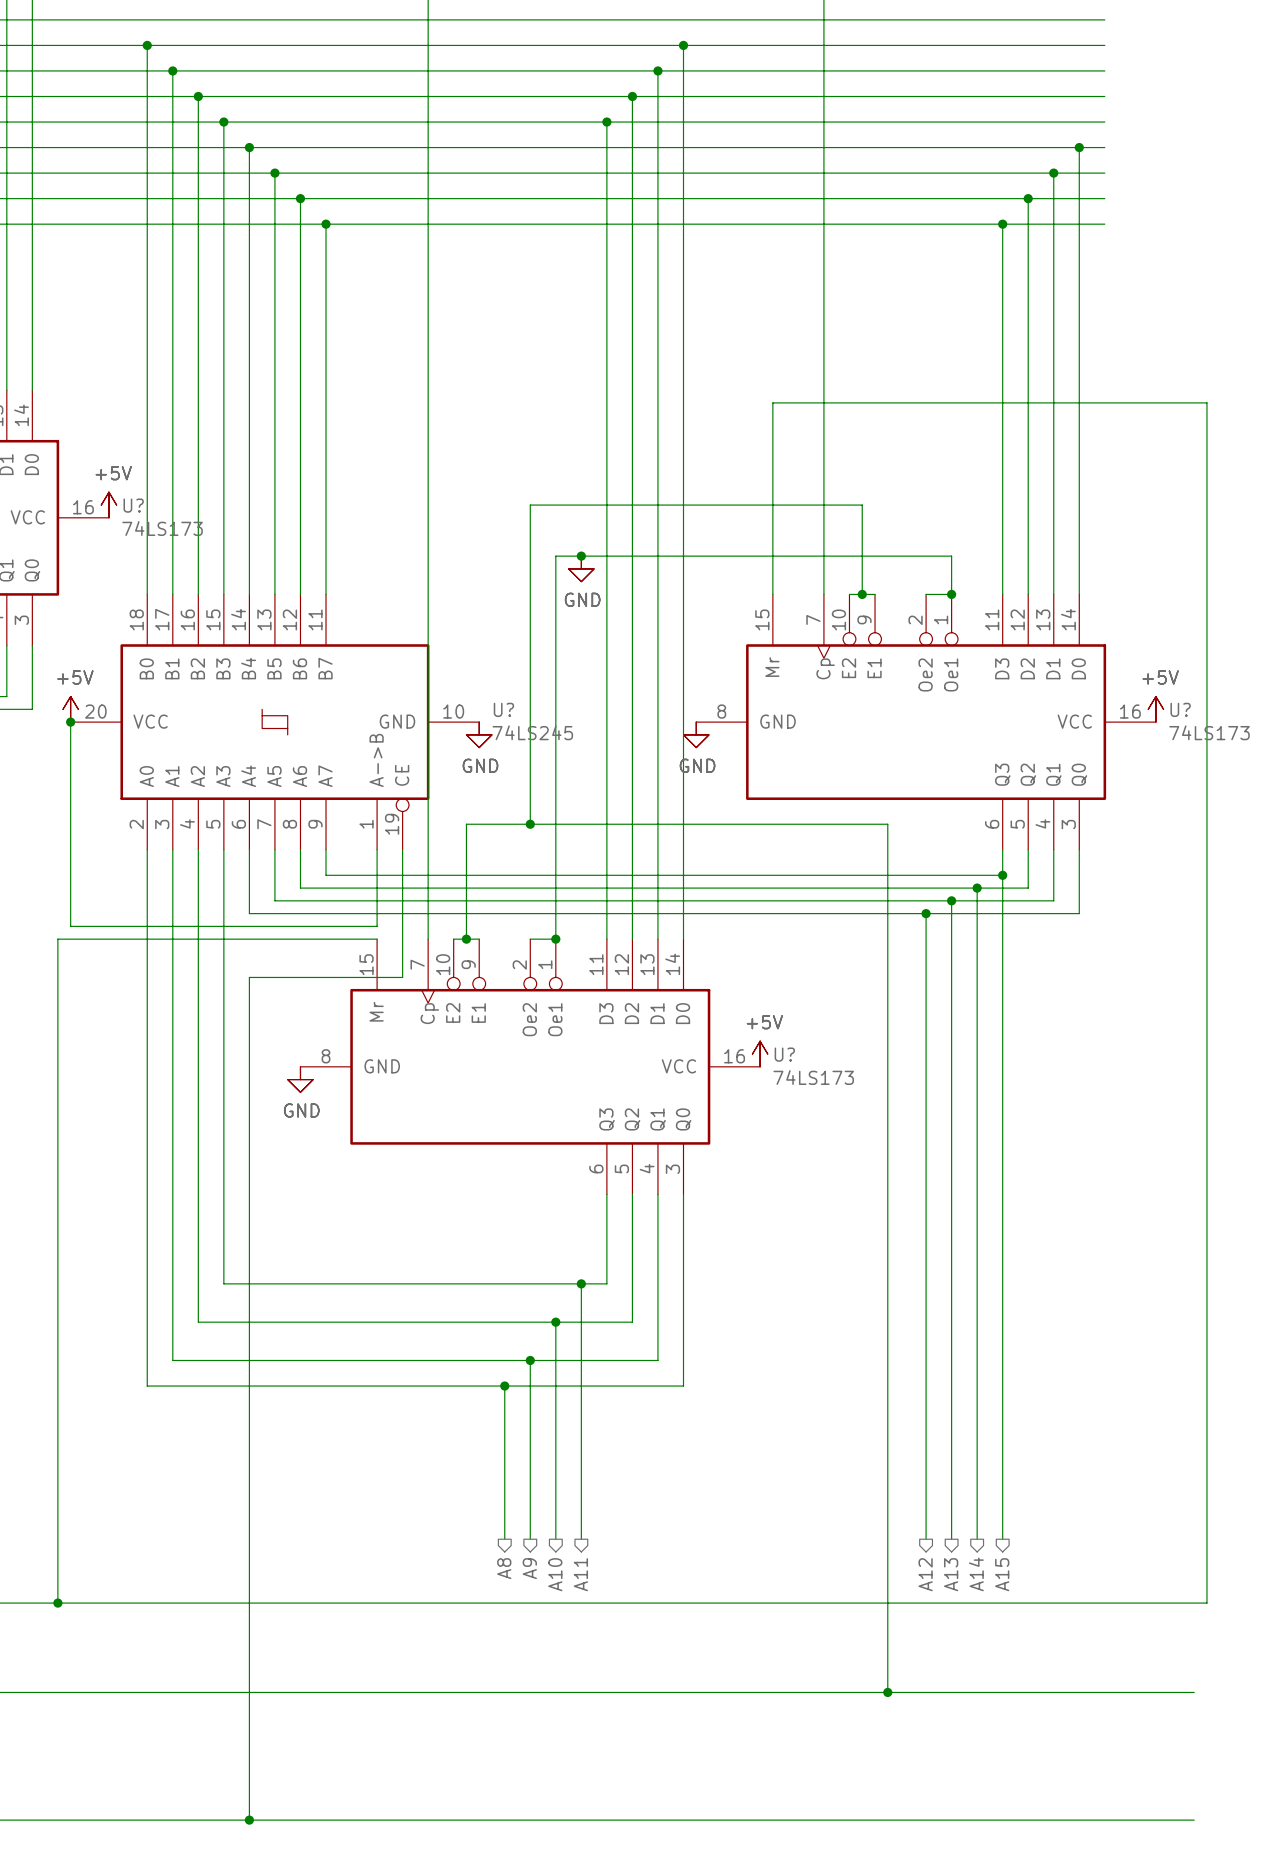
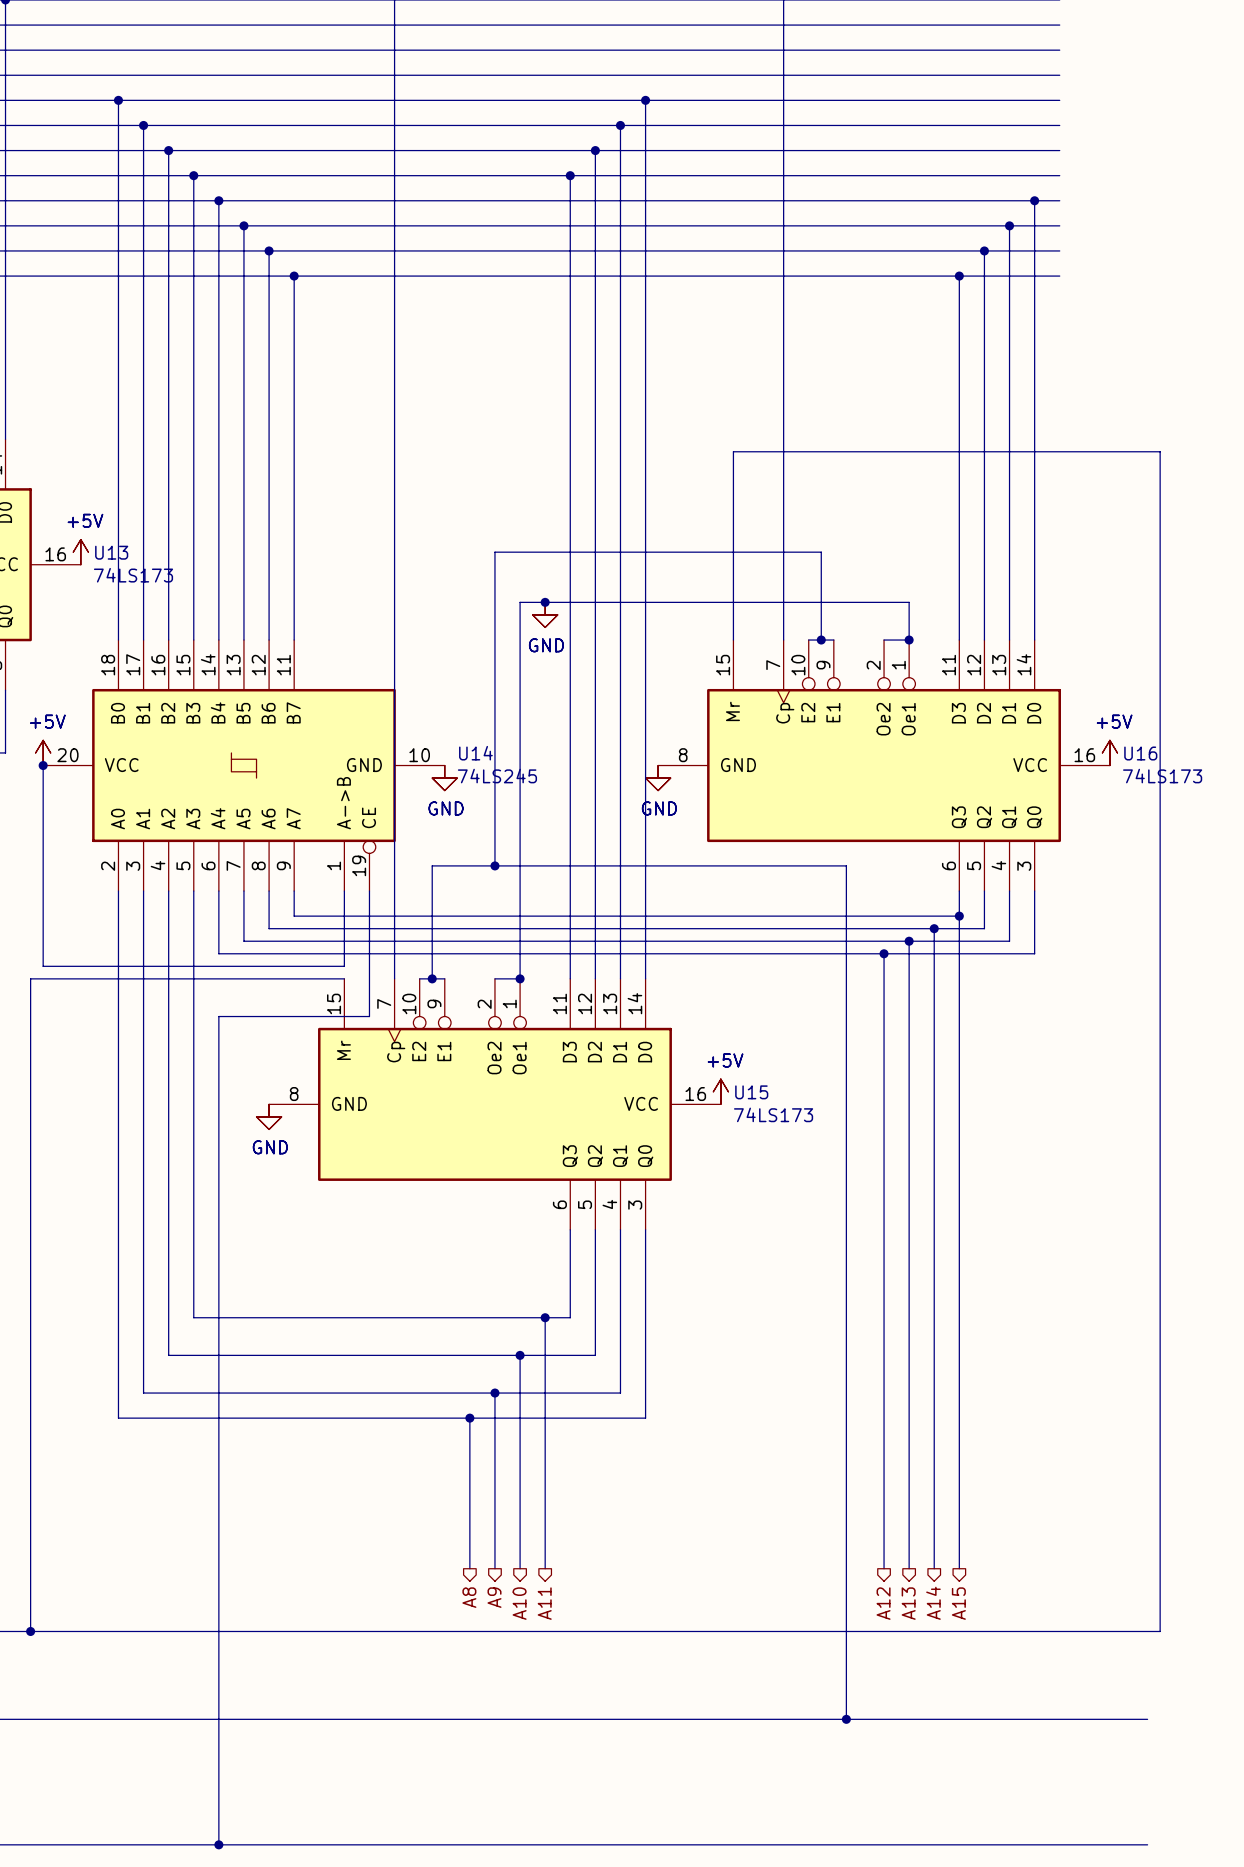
U? name: U? (133, 505) -> U13 (111, 552)
U? name: U? (503, 709) -> U14 (475, 753)
U? name: U? (1180, 709) -> U16 (1140, 753)
U? name: U? (784, 1054) -> U15 (751, 1092)

